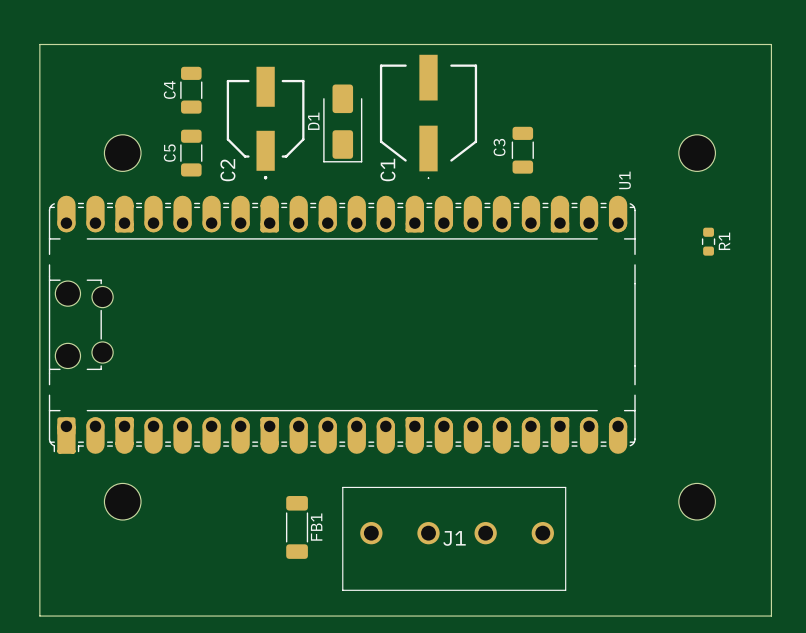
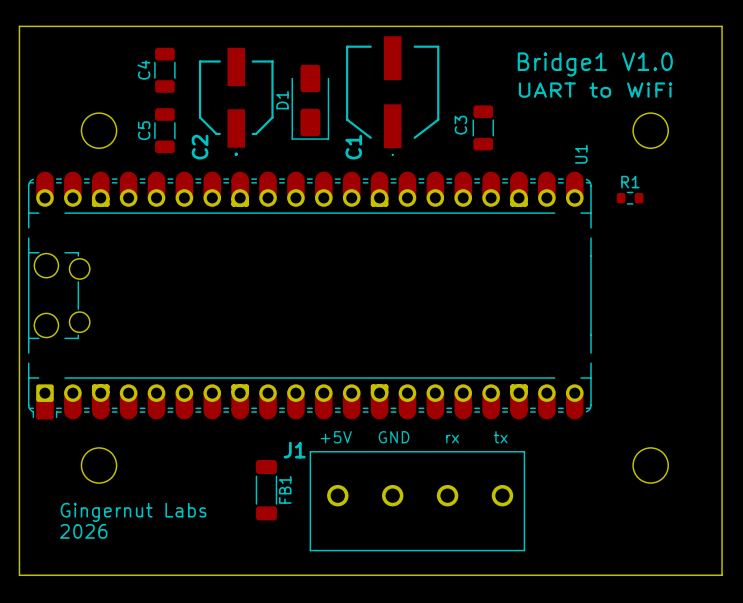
text: none -> Bridge1 V1.0 (595, 64)
text: none -> UART to WiFi (595, 90)
R1 rotation: 0° (708, 241) -> 90° clockwise (630, 198)
R1 position: (708, 241) -> (630, 198)
R1 name position: R1 (724, 241) -> R1 (630, 182)
text: none -> +5V GND rx tx (414, 437)
J1 name position: J1 (454, 538) -> J1 (294, 450)
text: none -> Gingernut Labs (133, 512)
text: none -> 2026 (83, 531)

